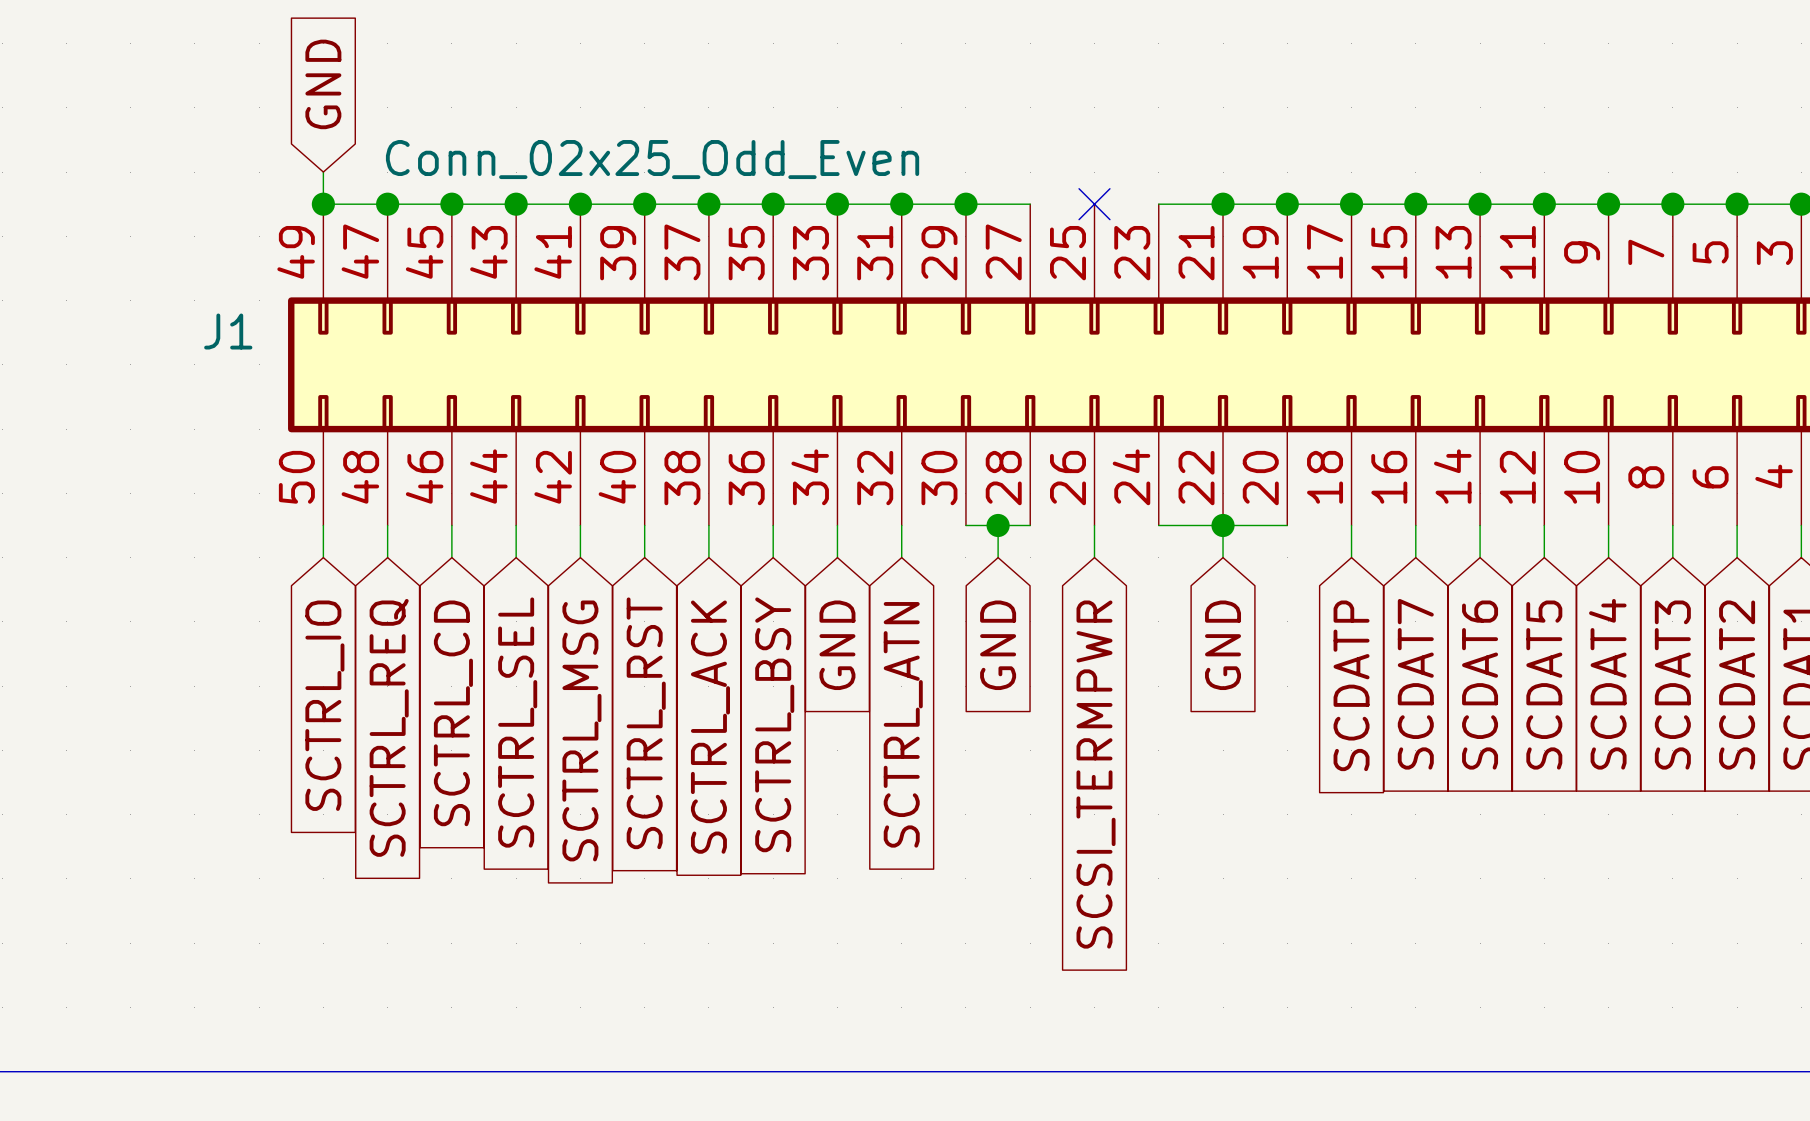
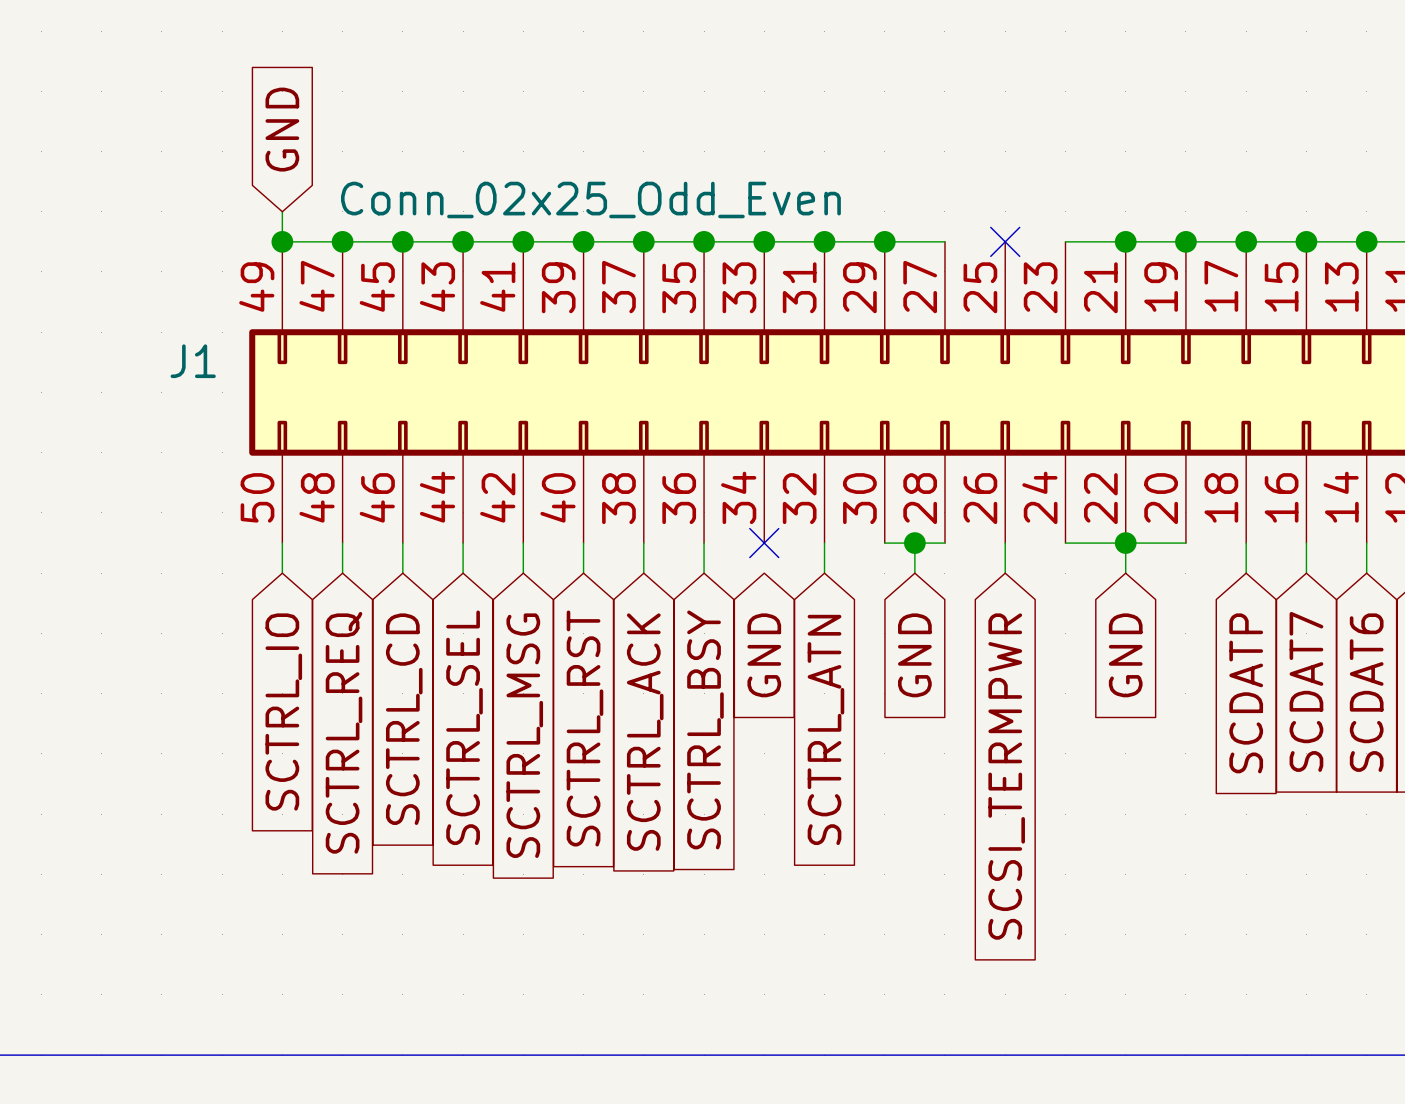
wire: (837, 525) (837, 557) -> none
no-connect mark: none -> (764, 543)

